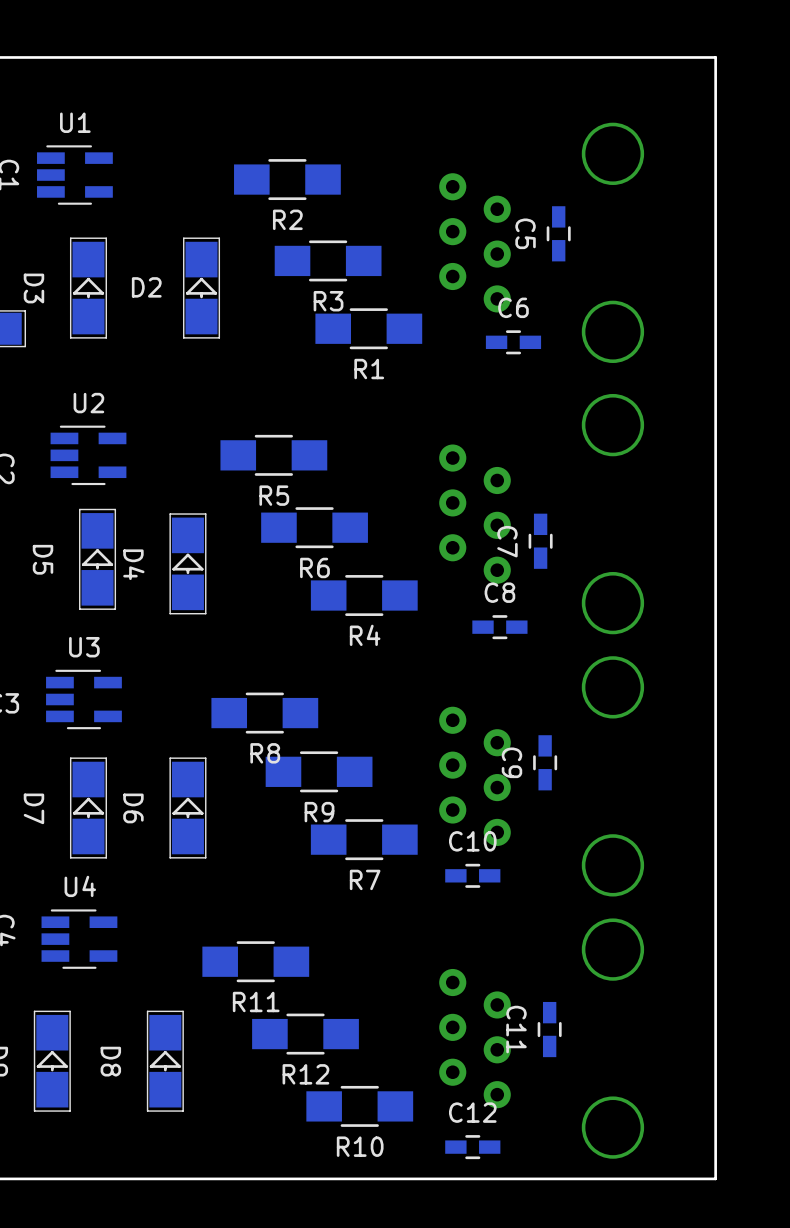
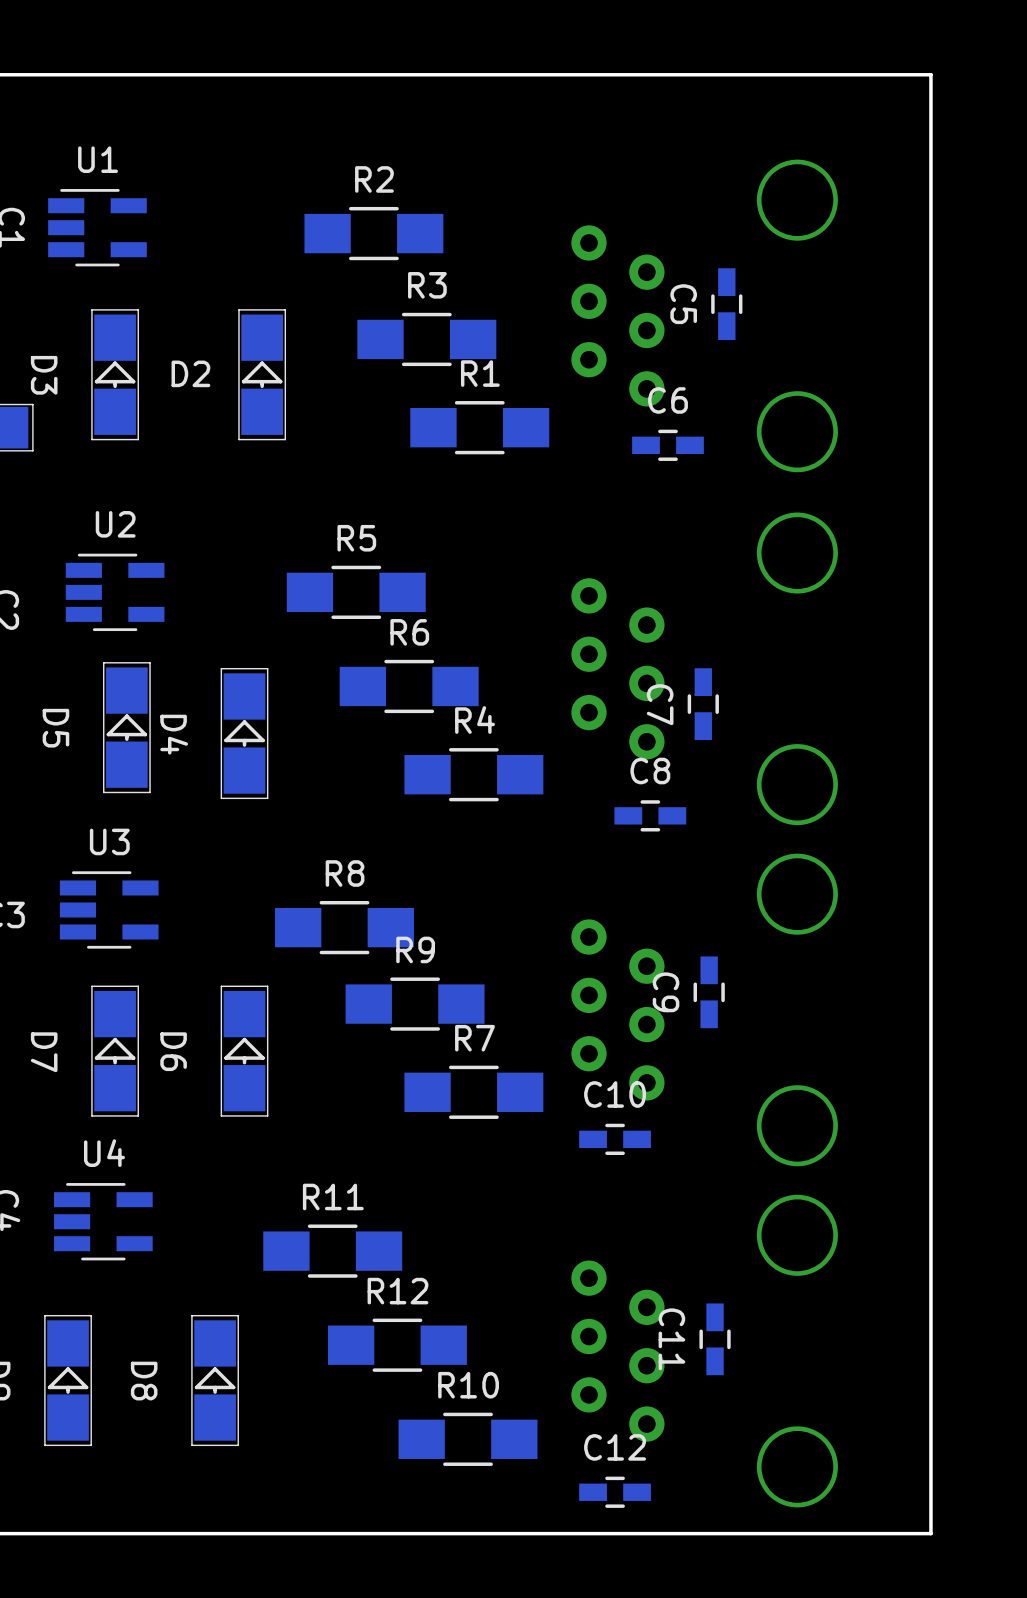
R2 name position: R2 (287, 219) -> R2 (374, 179)
R3 name position: R3 (328, 301) -> R3 (427, 285)
R1 name position: R1 (369, 369) -> R1 (480, 373)
R5 name position: R5 (274, 495) -> R5 (356, 538)
R6 name position: R6 (314, 567) -> R6 (409, 632)
R4 name position: R4 (365, 635) -> R4 (475, 720)
R8 name position: R8 (265, 753) -> R8 (345, 873)
R9 name position: R9 (319, 812) -> R9 (415, 949)
R7 name position: R7 (365, 879) -> R7 (475, 1038)
R11 name position: R11 (256, 1002) -> R11 (333, 1196)
R12 name position: R12 (305, 1074) -> R12 (397, 1291)
R10 name position: R10 (360, 1146) -> R10 (468, 1385)

